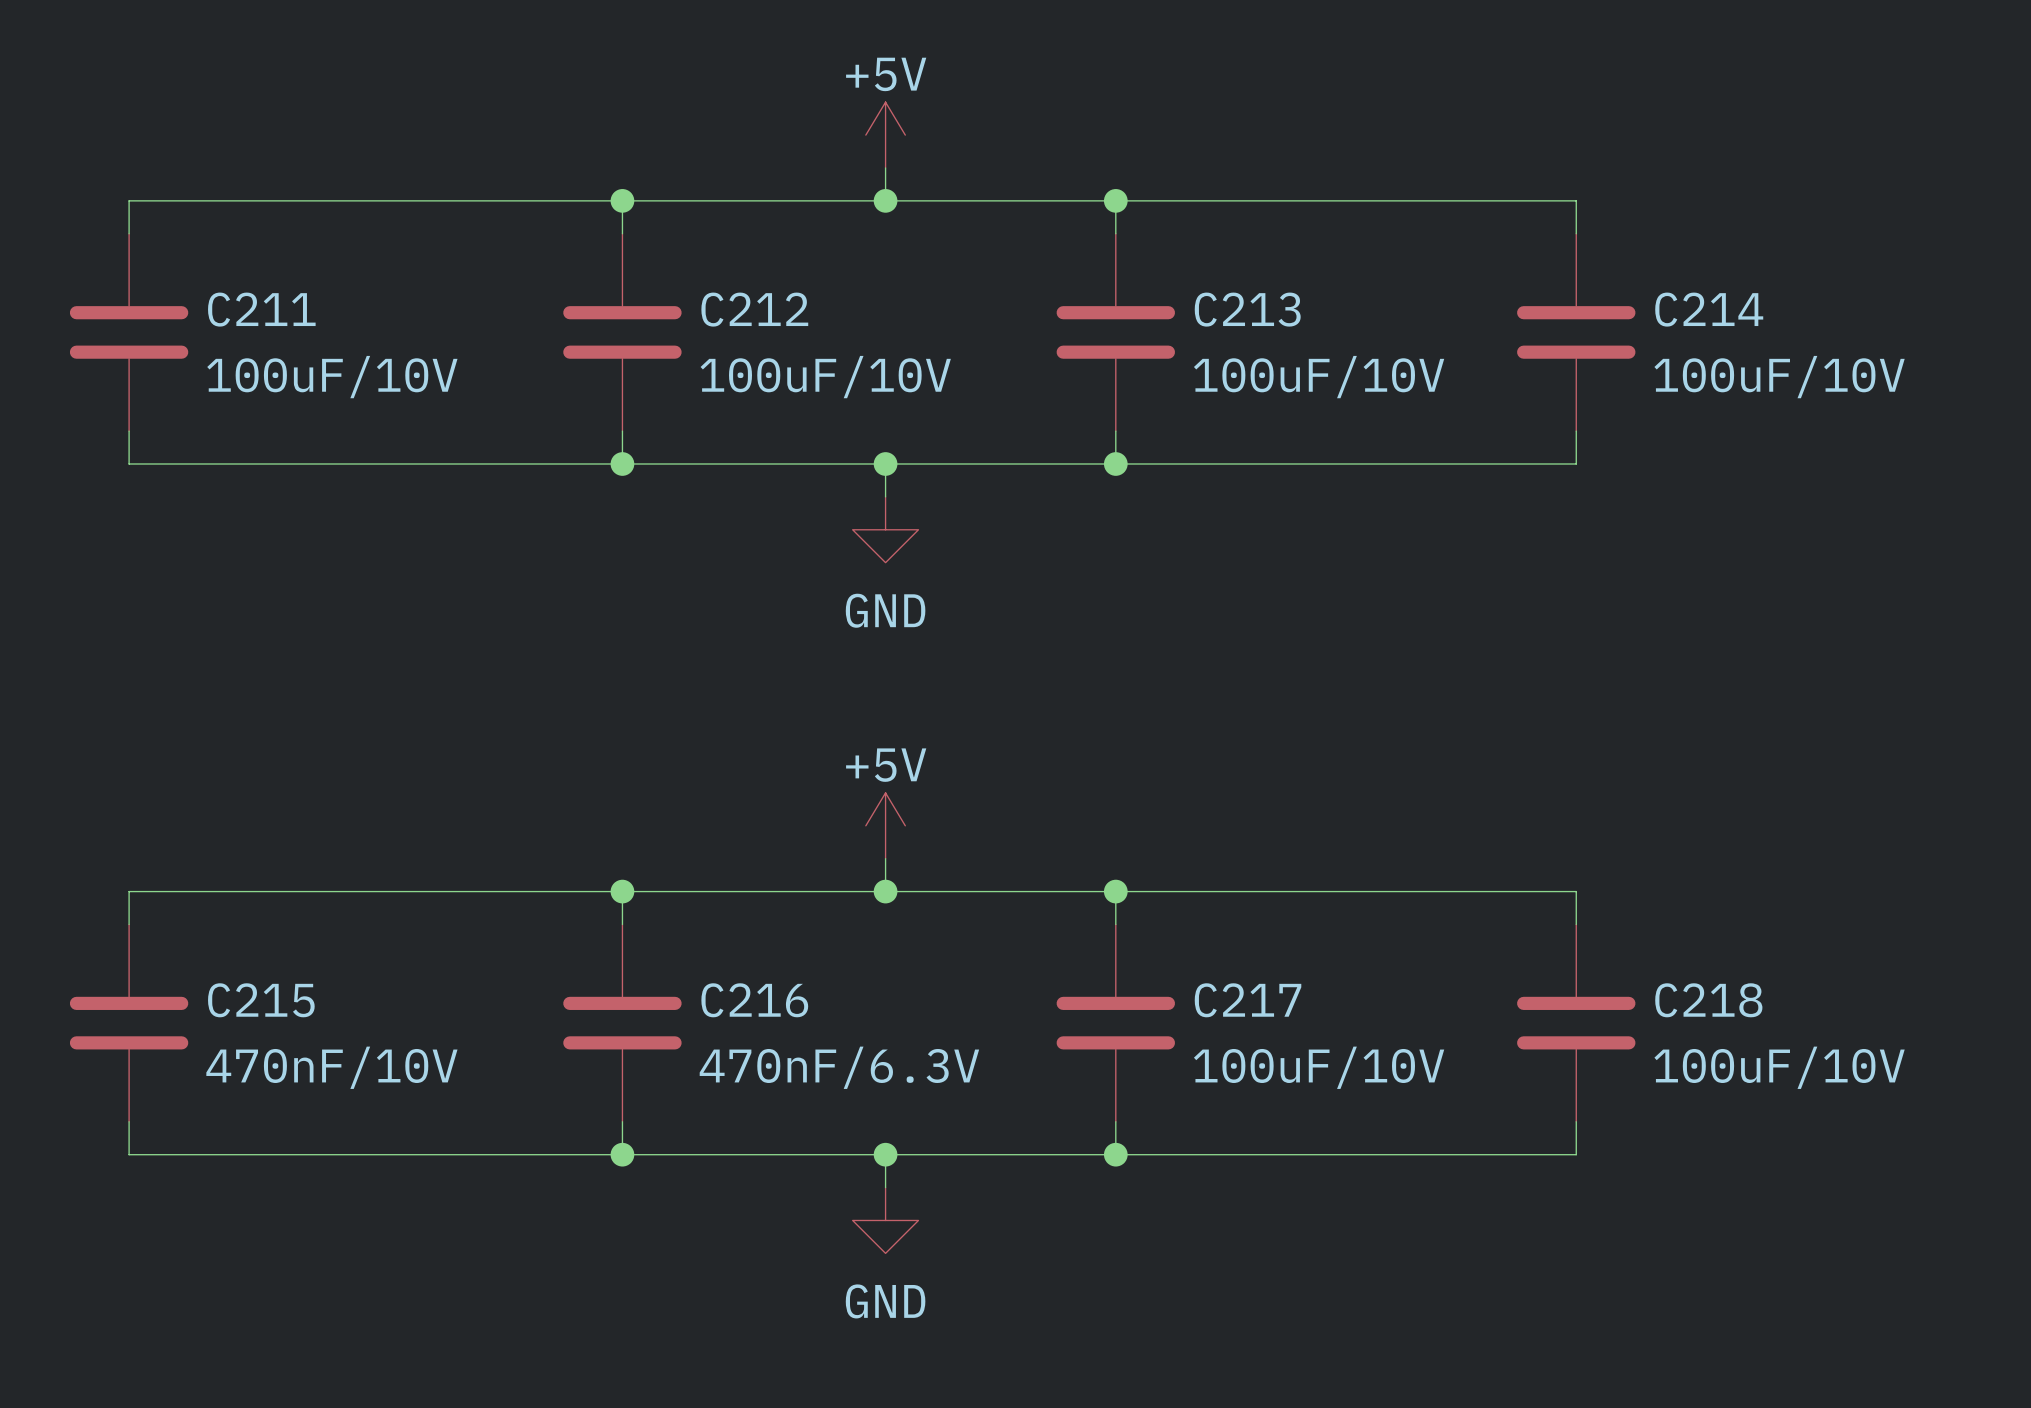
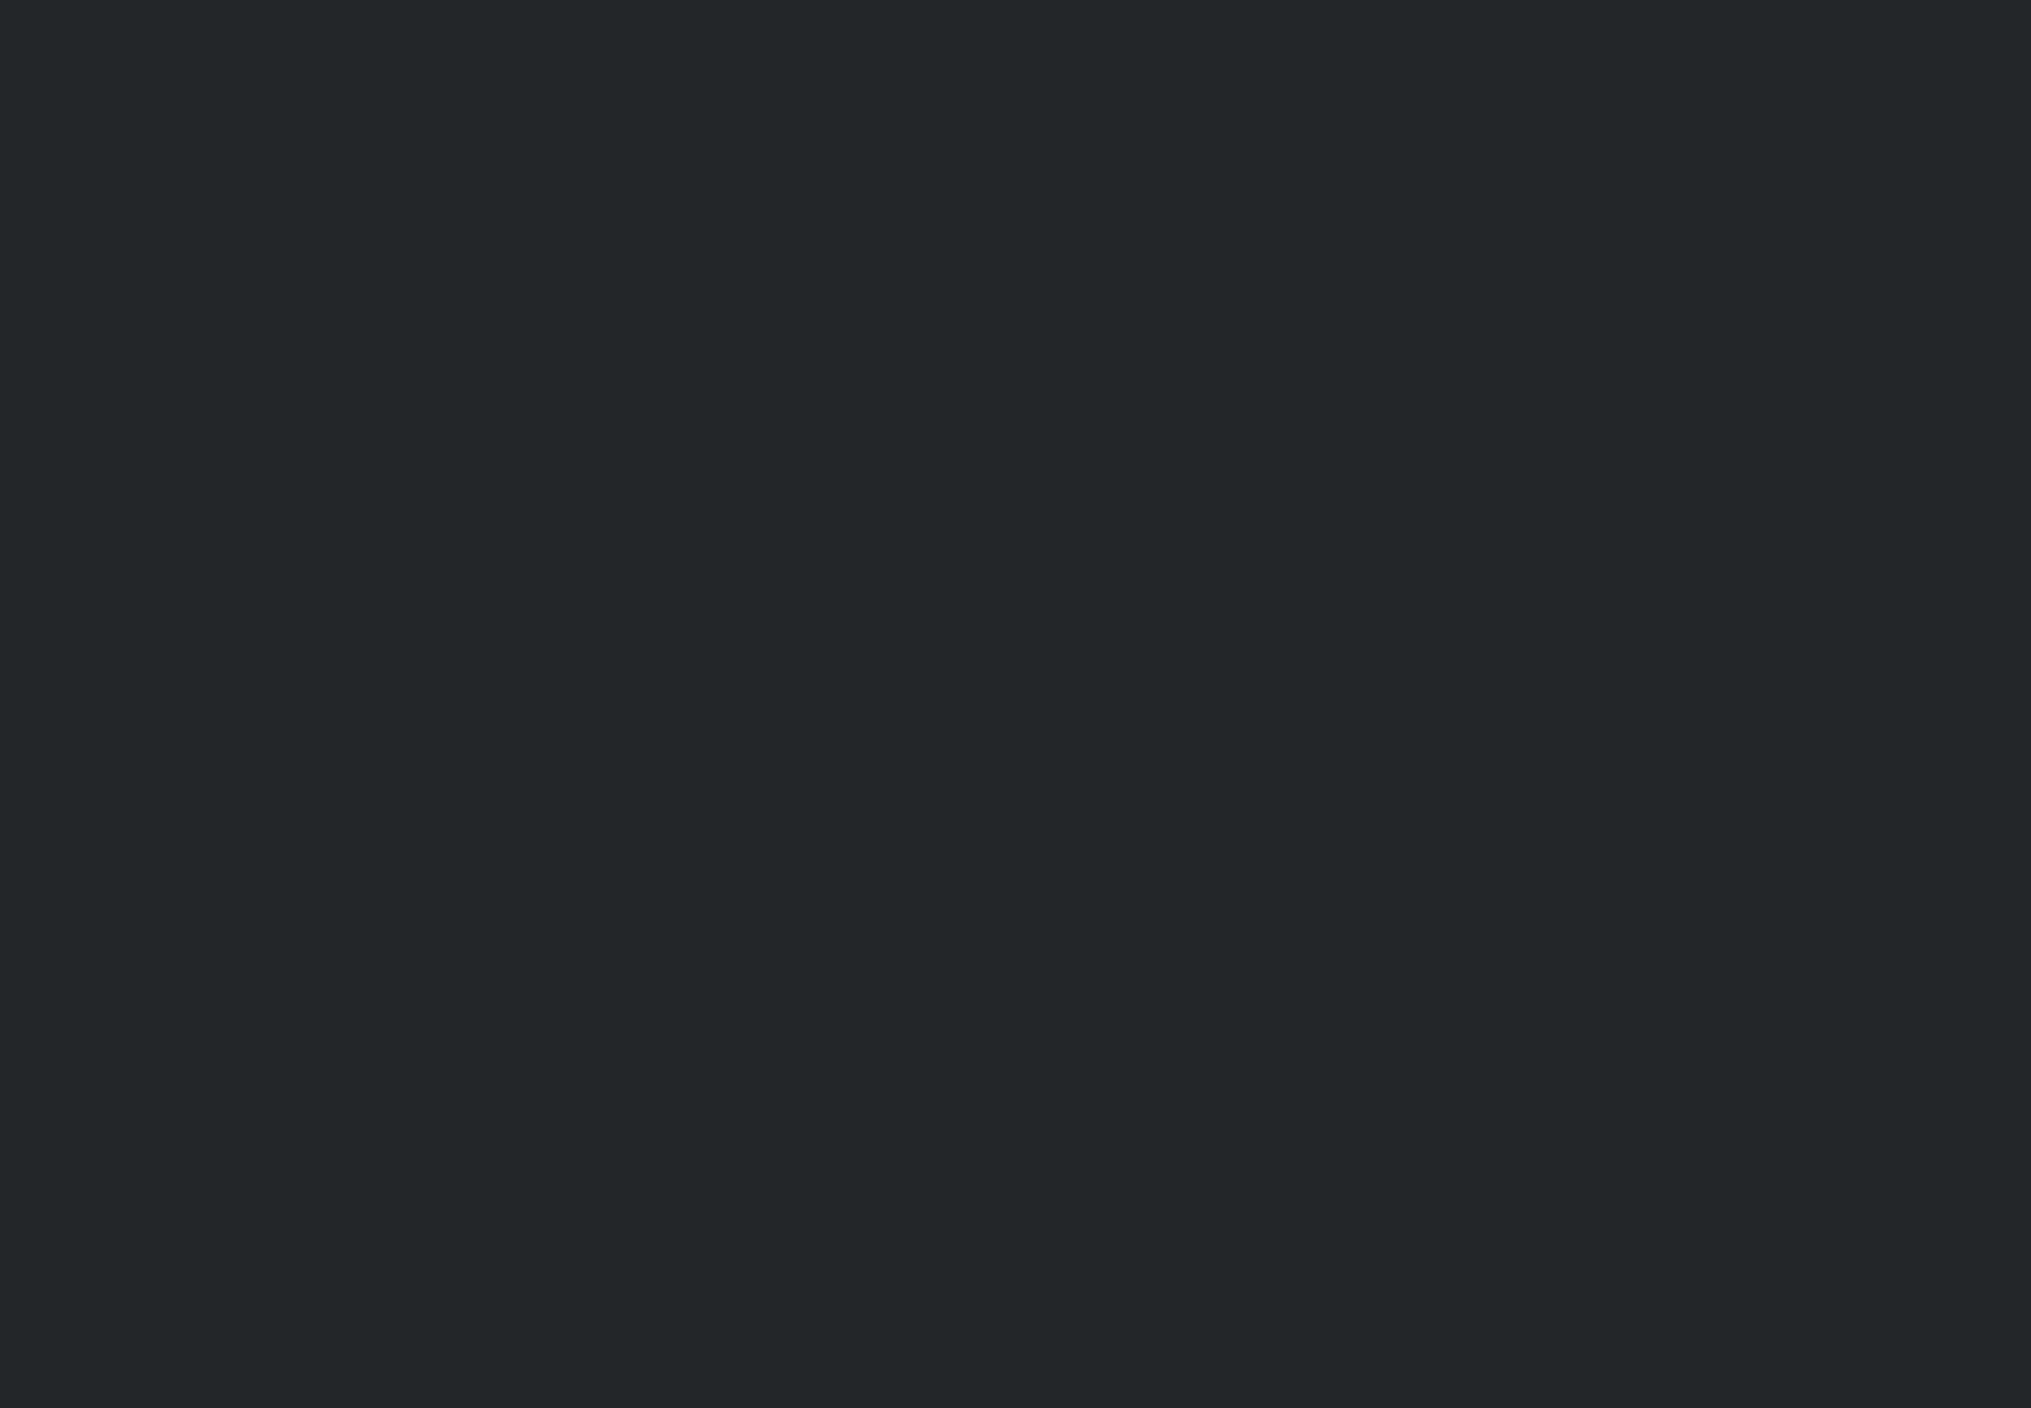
power symbol: +5V (885, 135) -> none
wire: (885, 167) (885, 200) -> none
wire: (622, 200) (622, 233) -> none
junction: (622, 200) -> none
junction: (885, 200) -> none
wire: (1115, 200) (1115, 233) -> none
junction: (1115, 200) -> none
wire: (129, 233) (129, 200) (1576, 200) (1576, 233) -> none
C211: 100uF/10V (129, 332) -> none
C212: 100uF/10V (622, 332) -> none
C213: 100uF/10V (1115, 332) -> none
C214: 100uF/10V (1576, 332) -> none
wire: (129, 431) (129, 463) (1576, 463) (1576, 431) -> none
wire: (622, 431) (622, 463) -> none
wire: (1115, 431) (1115, 463) -> none
junction: (622, 463) -> none
wire: (885, 463) (885, 496) -> none
junction: (885, 463) -> none
junction: (1115, 463) -> none
power symbol: GND (885, 529) -> none
power symbol: +5V (885, 825) -> none
wire: (885, 858) (885, 891) -> none
wire: (622, 891) (622, 924) -> none
junction: (622, 891) -> none
junction: (885, 891) -> none
wire: (1115, 891) (1115, 924) -> none
junction: (1115, 891) -> none
wire: (129, 924) (129, 891) (1576, 891) (1576, 924) -> none
C215: 470nF/10V (129, 1023) -> none
C216: 470nF/6.3V (622, 1023) -> none
C217: 100uF/10V (1115, 1023) -> none
C218: 100uF/10V (1576, 1023) -> none
wire: (129, 1121) (129, 1154) (1576, 1154) (1576, 1121) -> none
wire: (622, 1121) (622, 1154) -> none
wire: (1115, 1121) (1115, 1154) -> none
junction: (622, 1154) -> none
wire: (885, 1154) (885, 1187) -> none
junction: (885, 1154) -> none
junction: (1115, 1154) -> none
power symbol: GND (885, 1220) -> none

